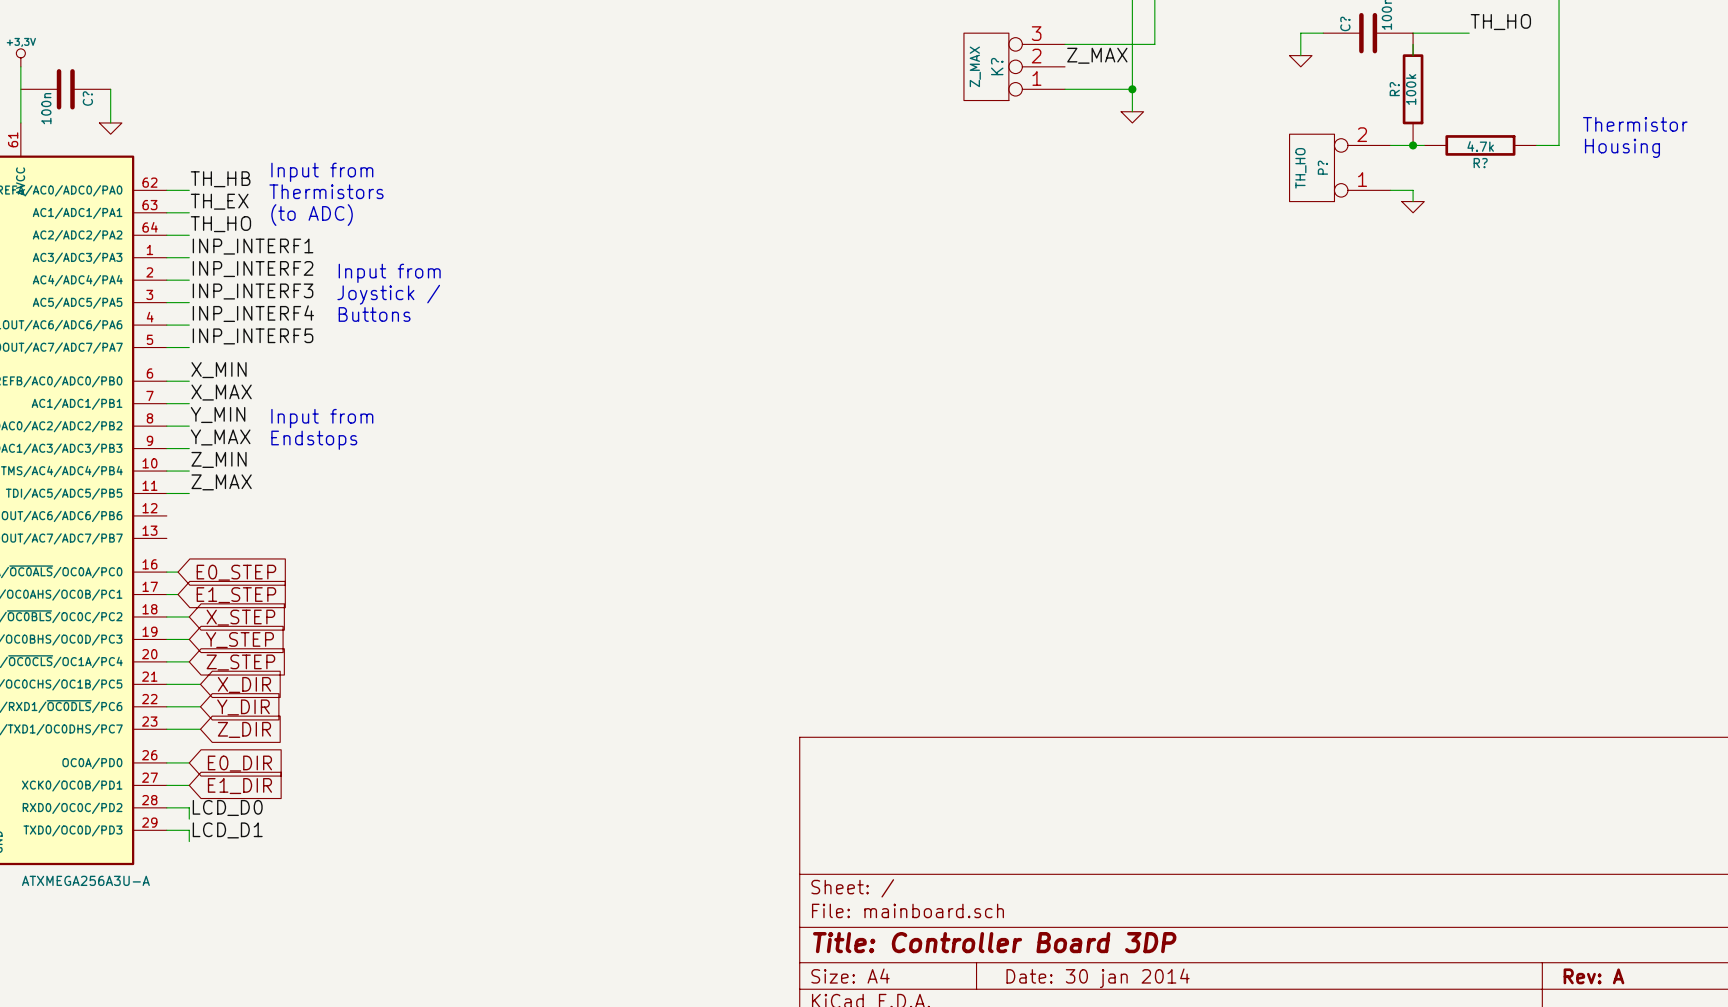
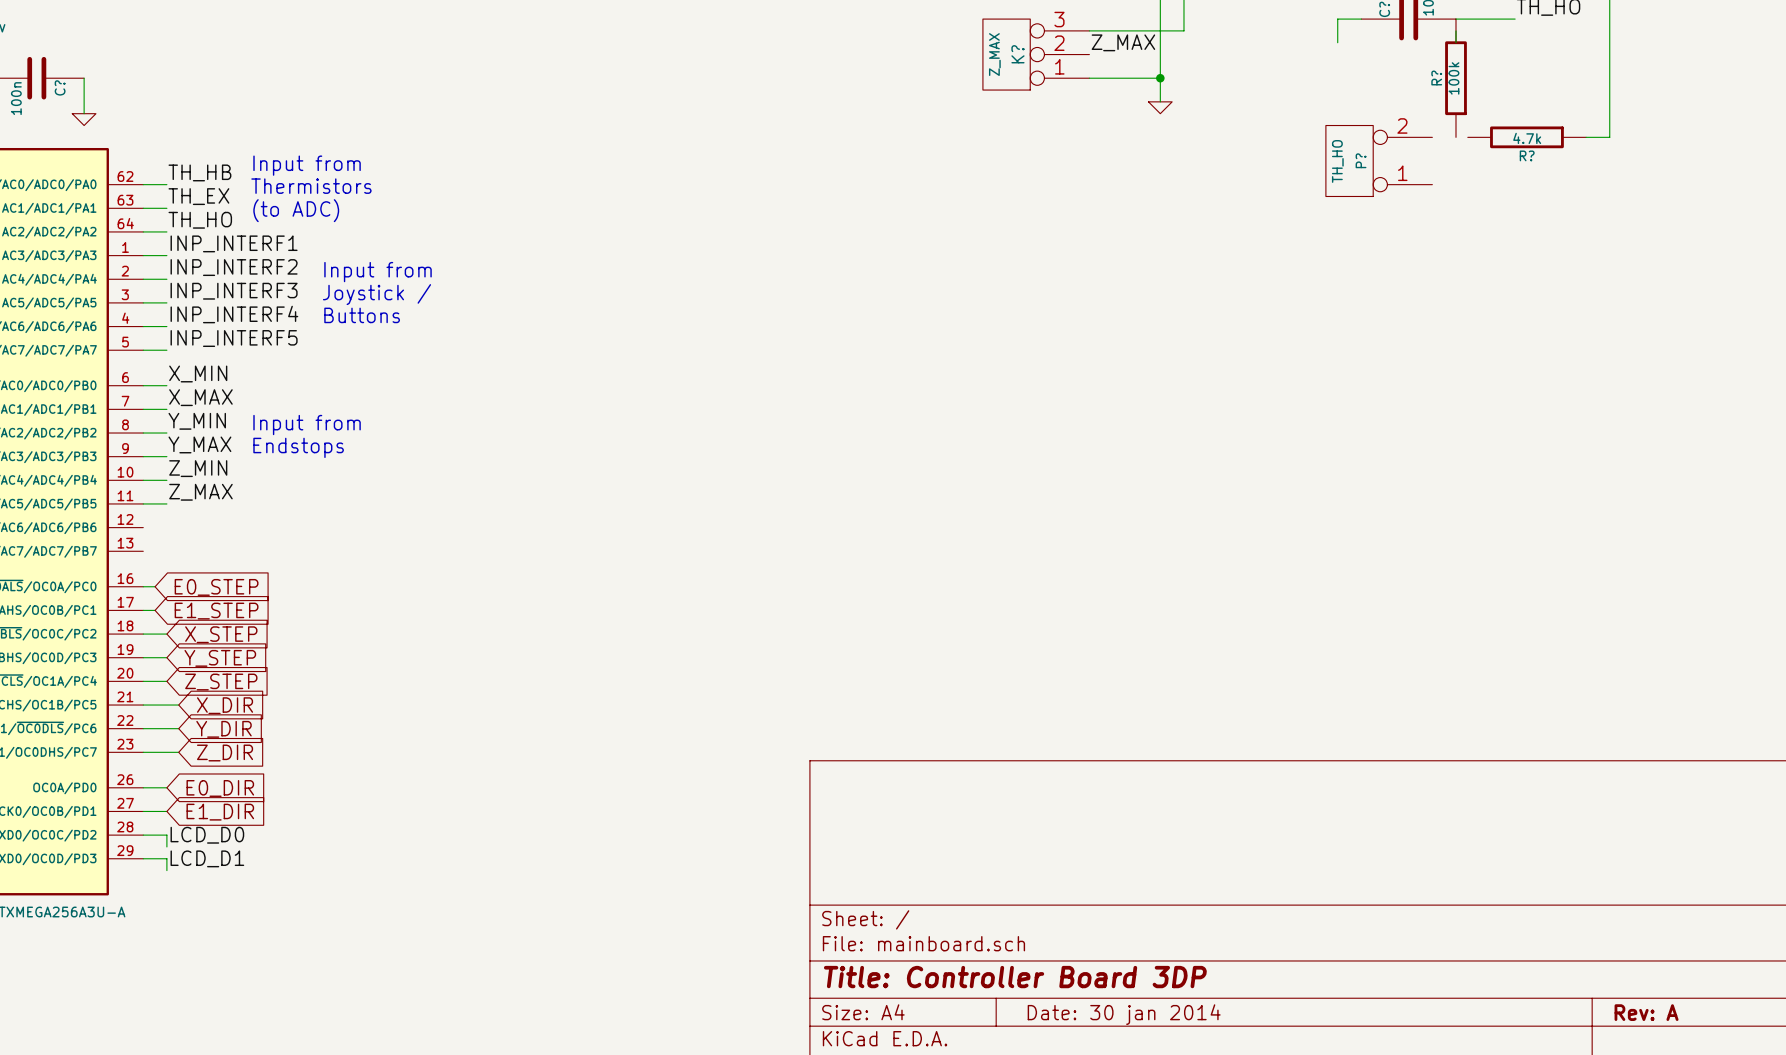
power symbol: (1300, 61) -> none
text: Thermistor (1635, 124) -> none
wire: (1390, 145) (1424, 145) -> none
junction: (1413, 145) -> none
text: Housing (1622, 148) -> none
wire: (1390, 190) (1413, 190) (1413, 201) -> none
power symbol: (1413, 207) -> none

